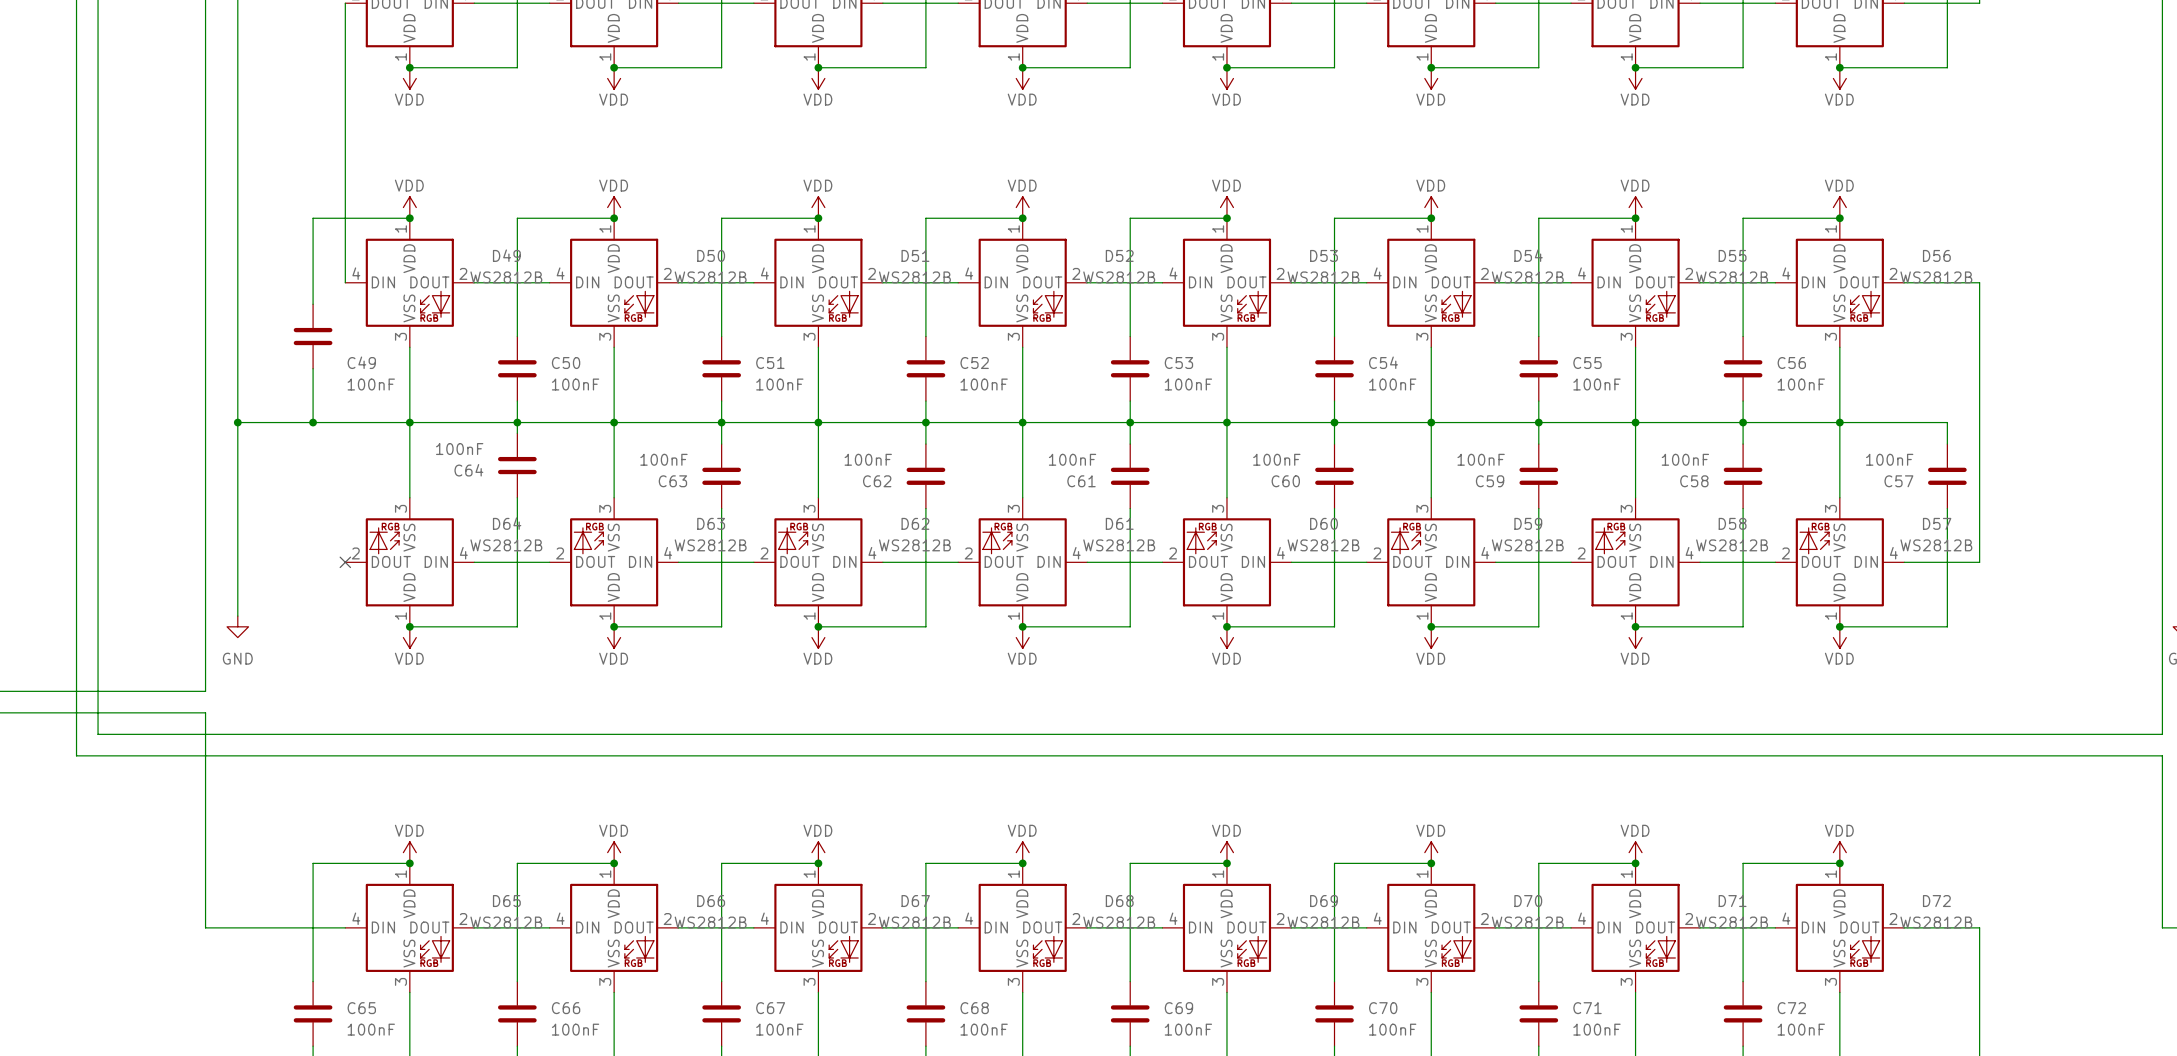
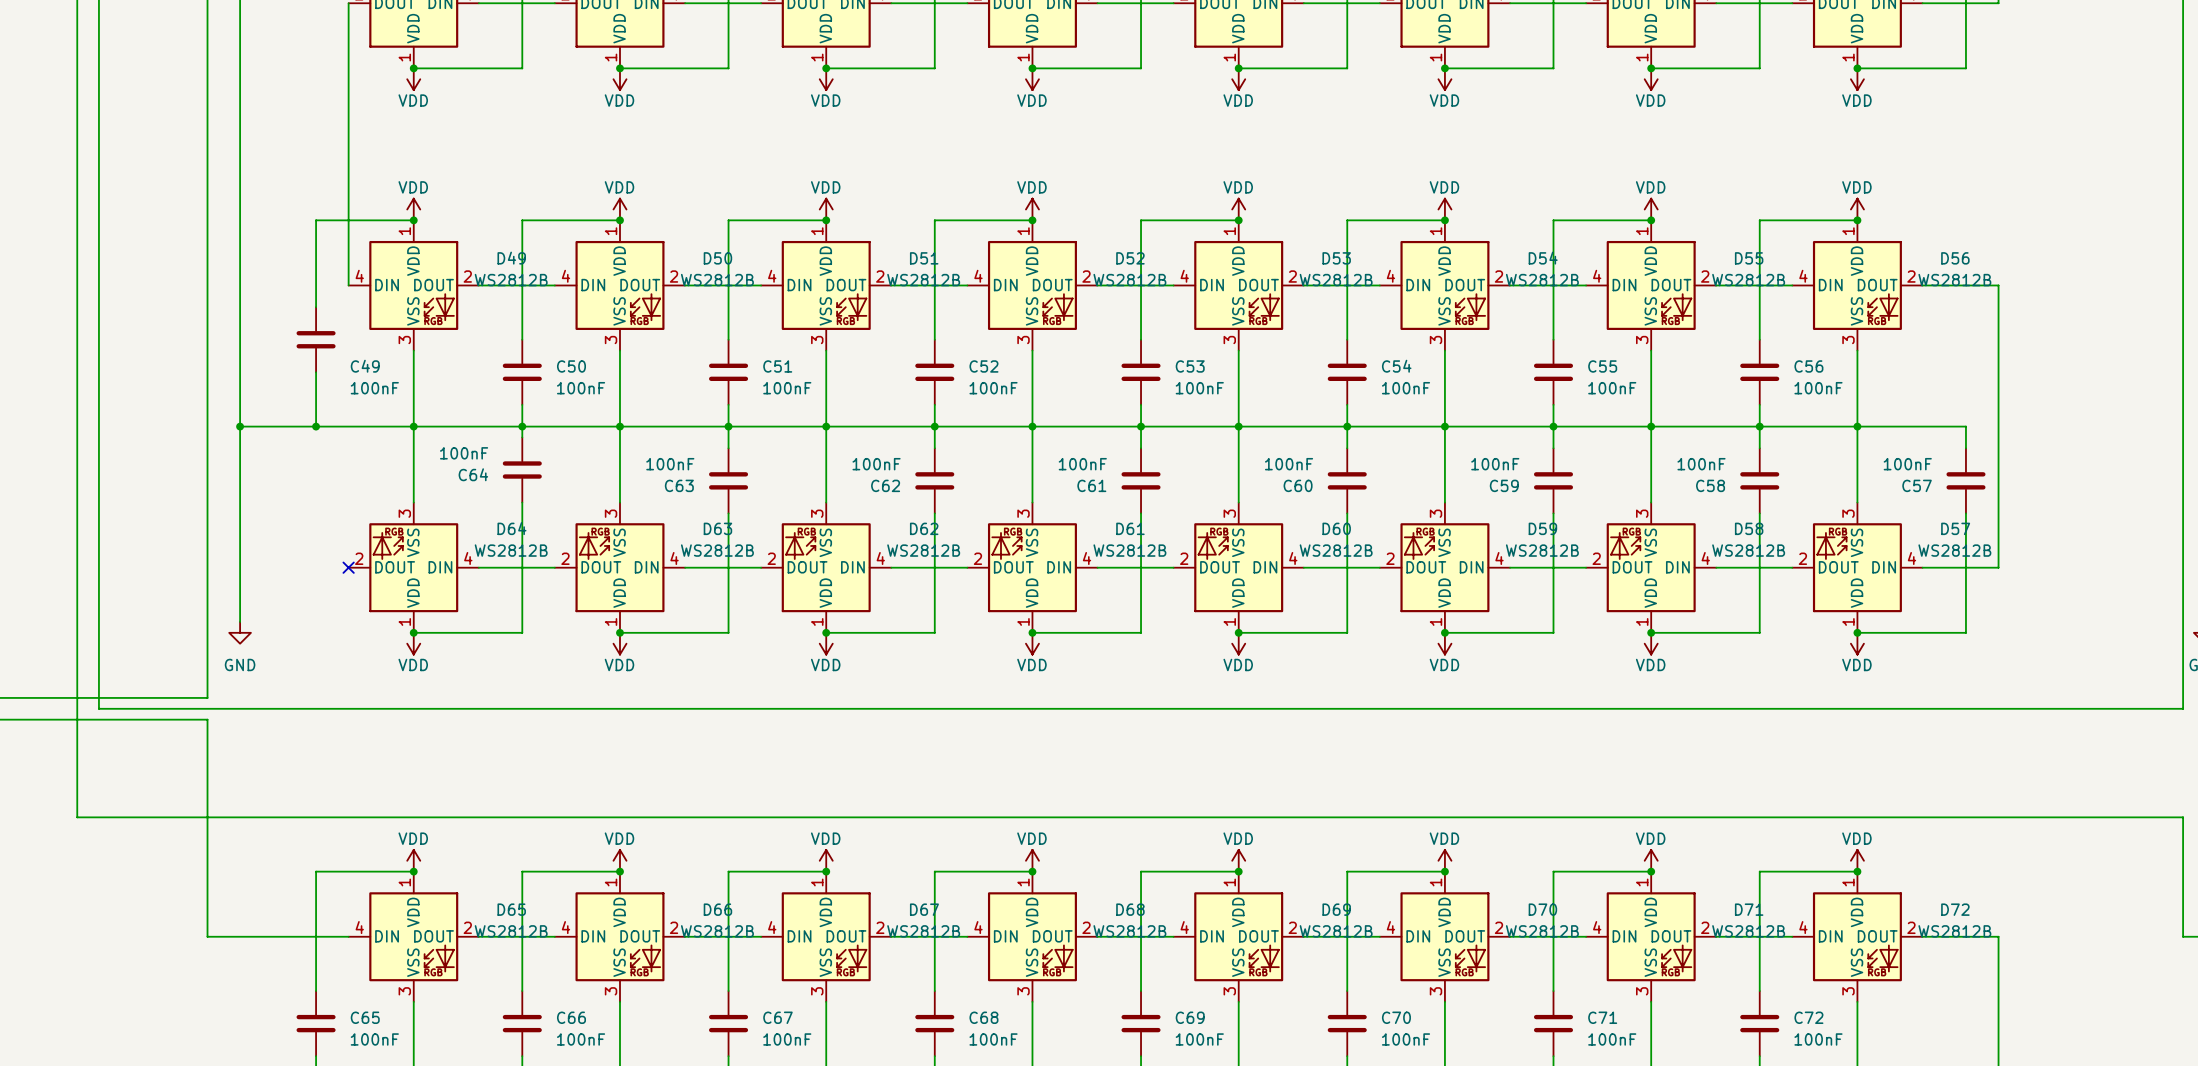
wire: (98, 702) (98, 734) (2162, 734) (2162, 702) -> (98, 708) (2183, 708)
wire: (76, 755) (2162, 755) (2162, 809) -> (77, 763) (77, 817) (2183, 817)

